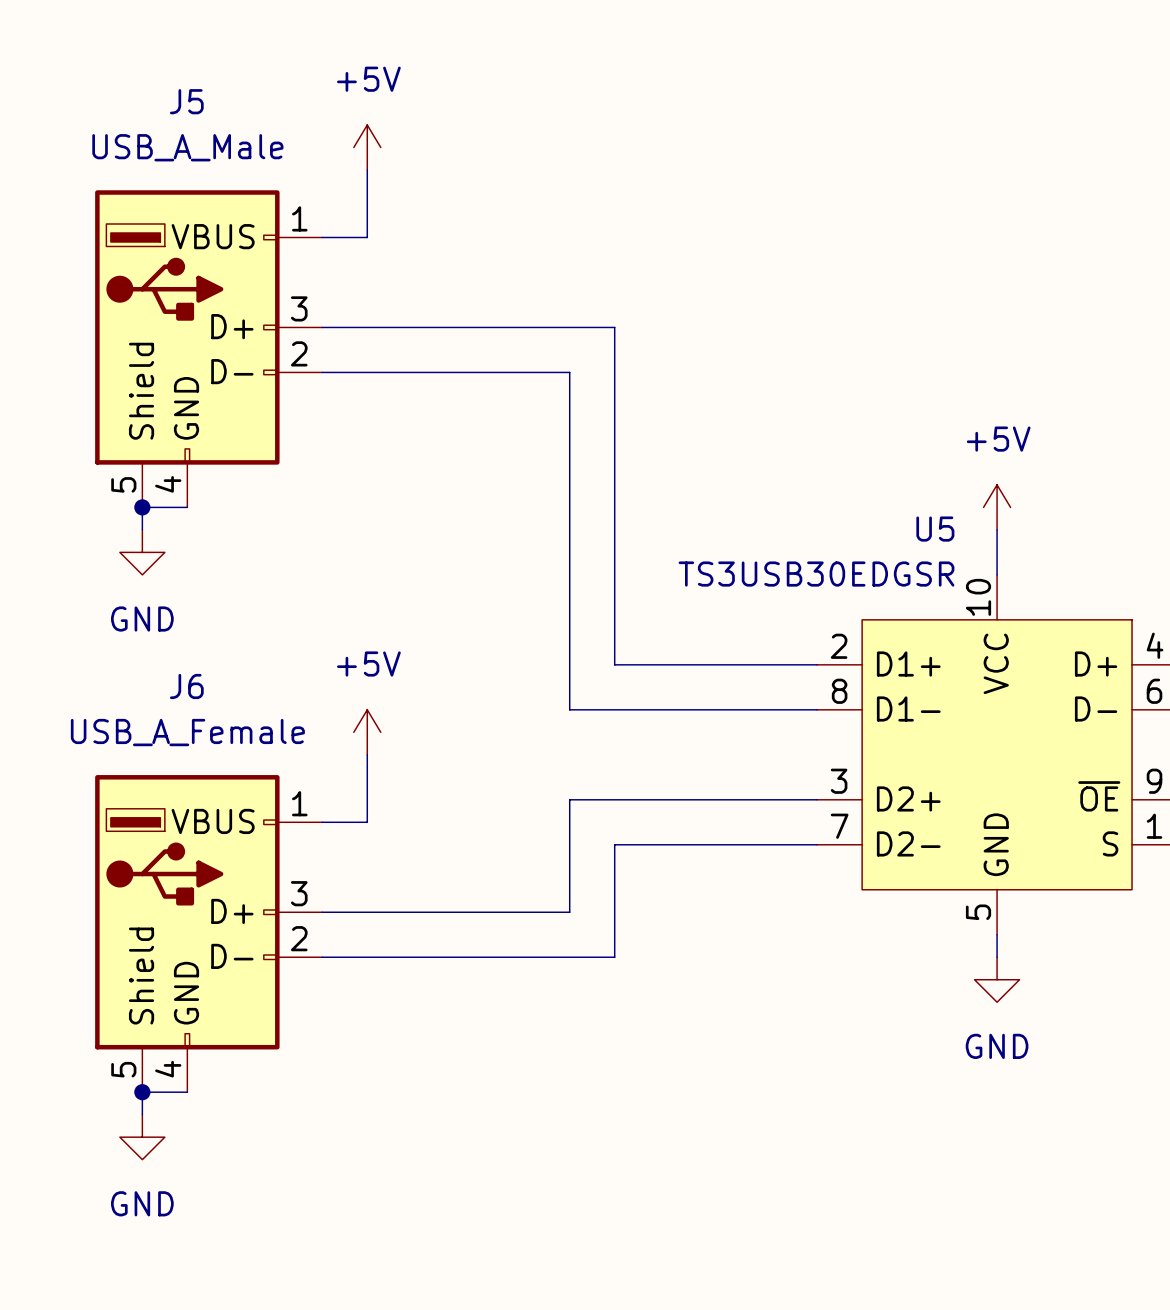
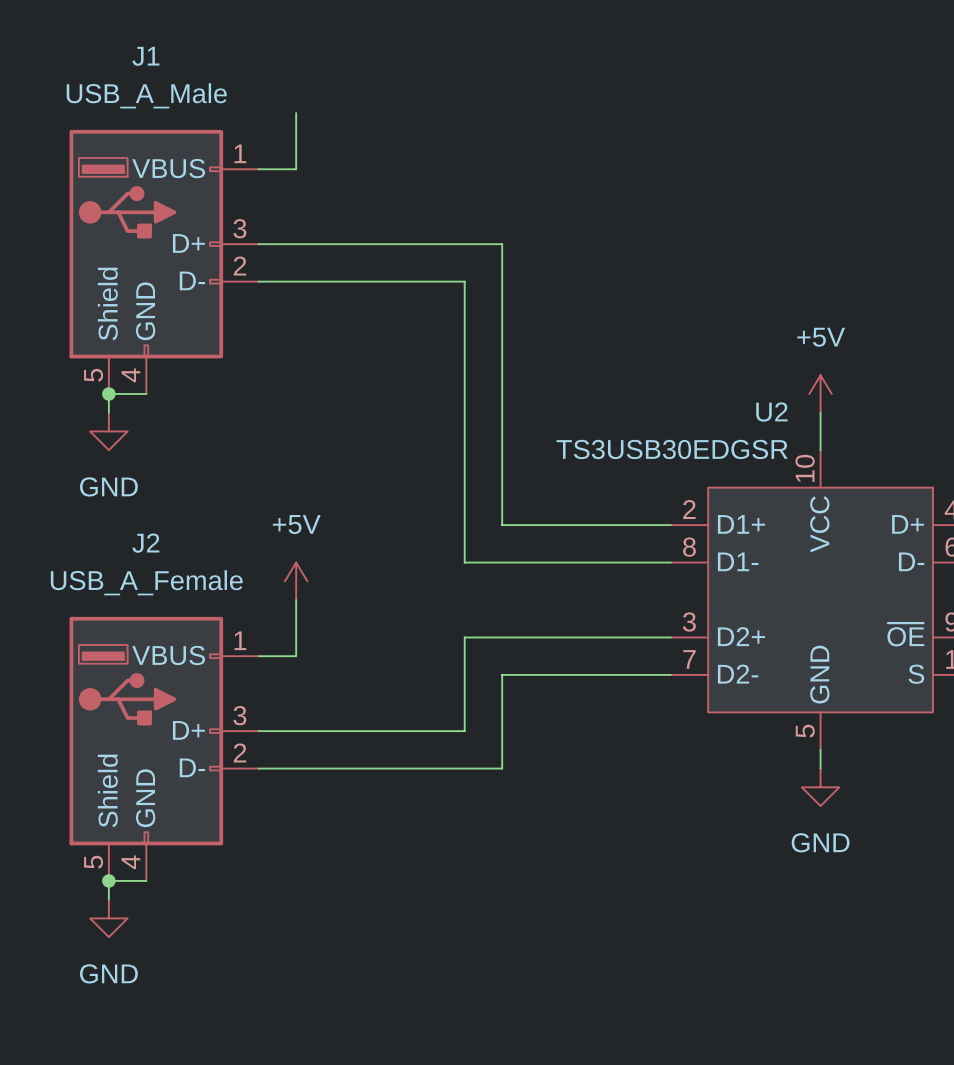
J5 name: J5 (186, 101) -> J1 (145, 56)
power symbol: +5V (367, 147) -> none
U5 name: U5 (935, 529) -> U2 (771, 412)
J6 name: J6 (186, 686) -> J2 (145, 543)

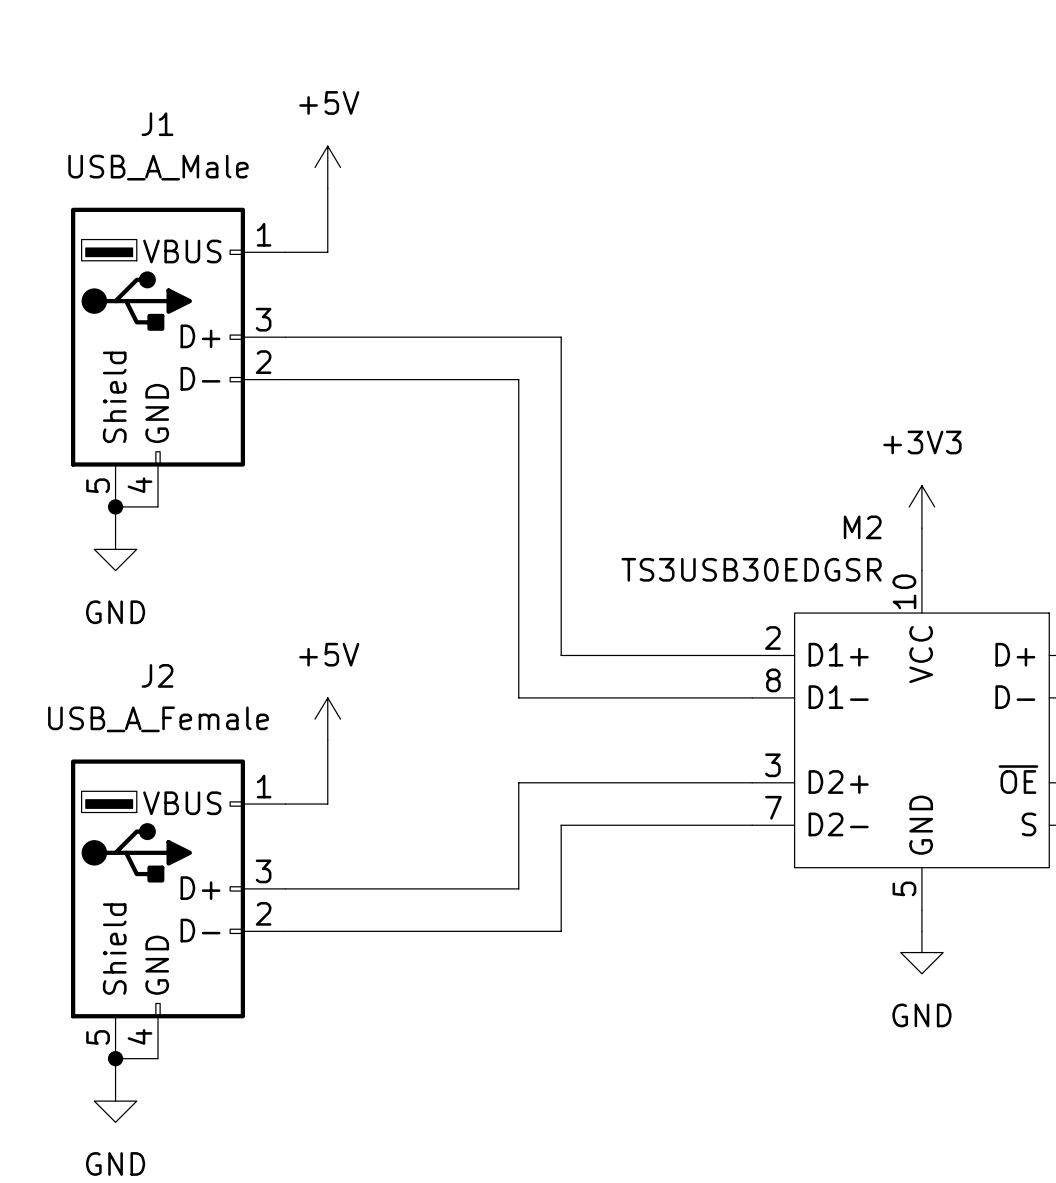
power symbol: none -> +5V (327, 167)
power symbol: +5V (820, 394) -> +3V3 (921, 506)
U2 name: U2 (771, 412) -> M2 (862, 527)

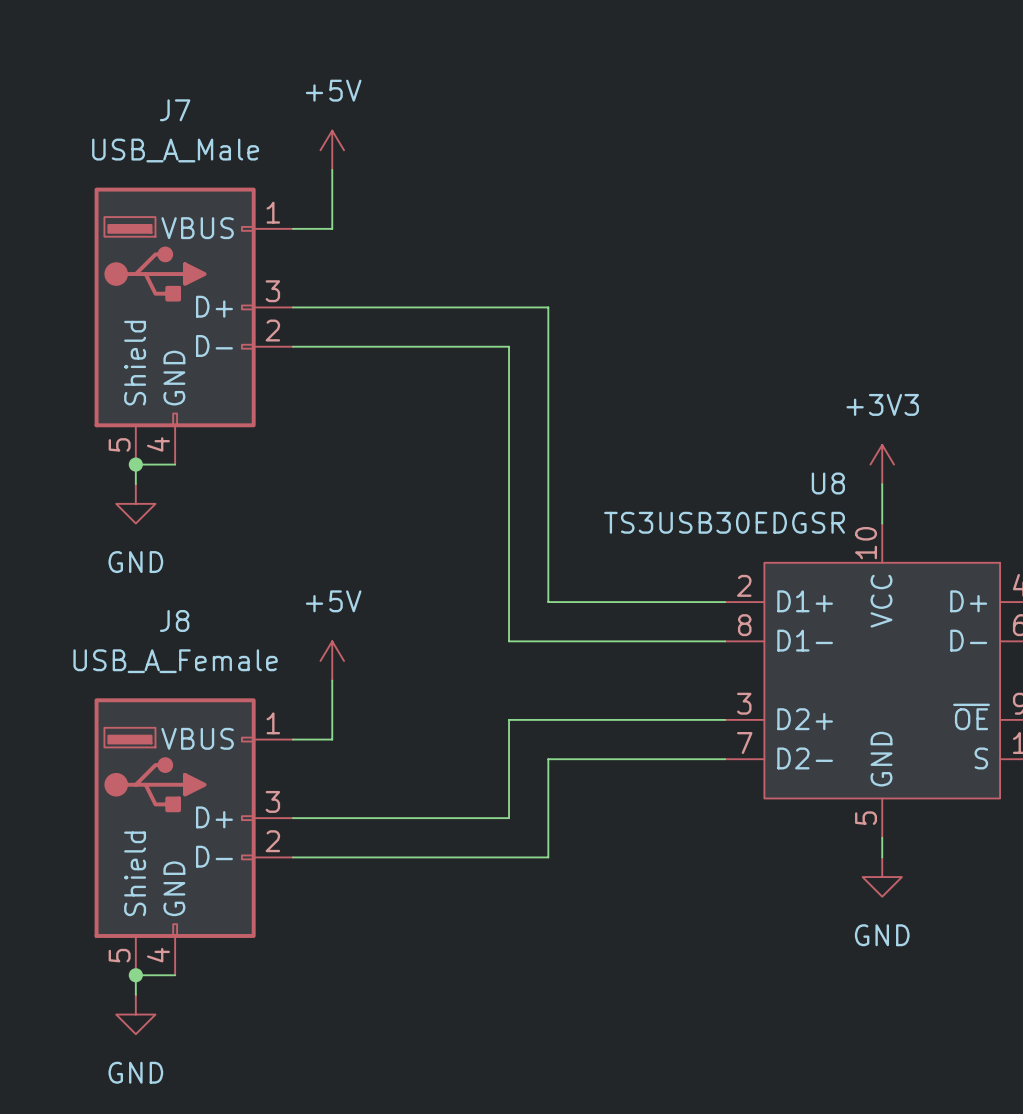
J1 name: J1 (157, 124) -> J7 (175, 110)
M2 name: M2 (862, 527) -> U8 (828, 483)
J2 name: J2 (157, 675) -> J8 (174, 620)

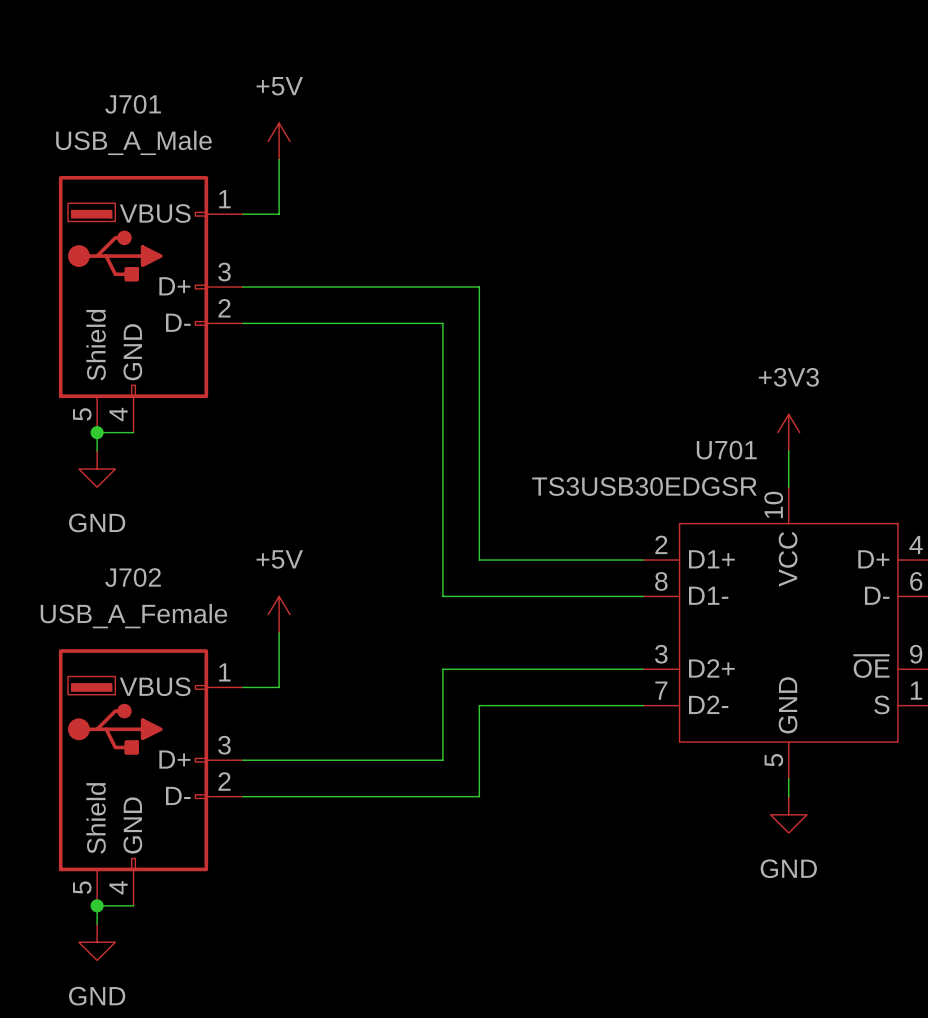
J7 name: J7 (175, 110) -> J701 (133, 104)
U8 name: U8 (828, 483) -> U701 (726, 450)
J8 name: J8 (174, 620) -> J702 (133, 577)

